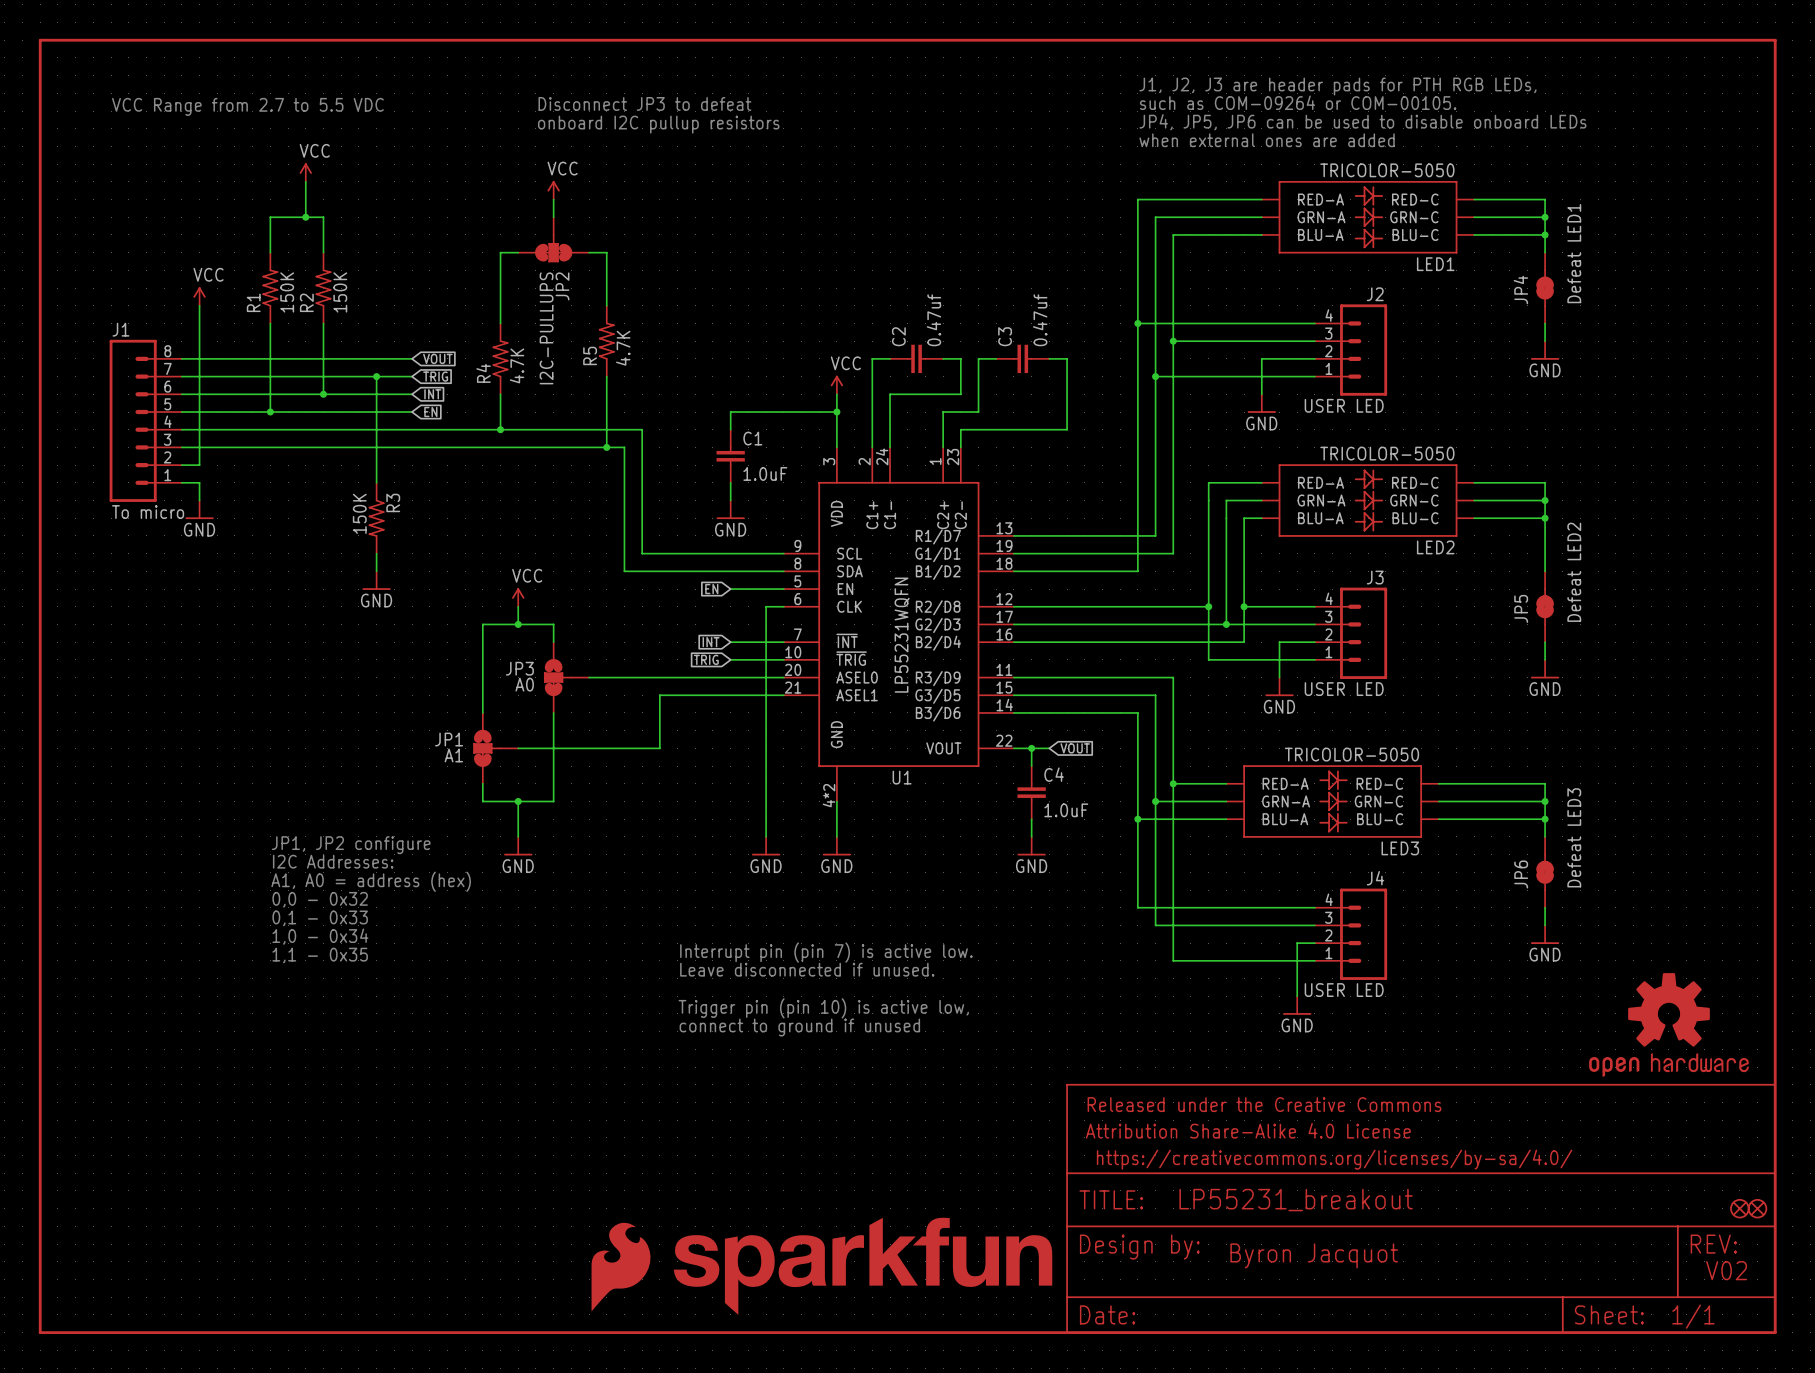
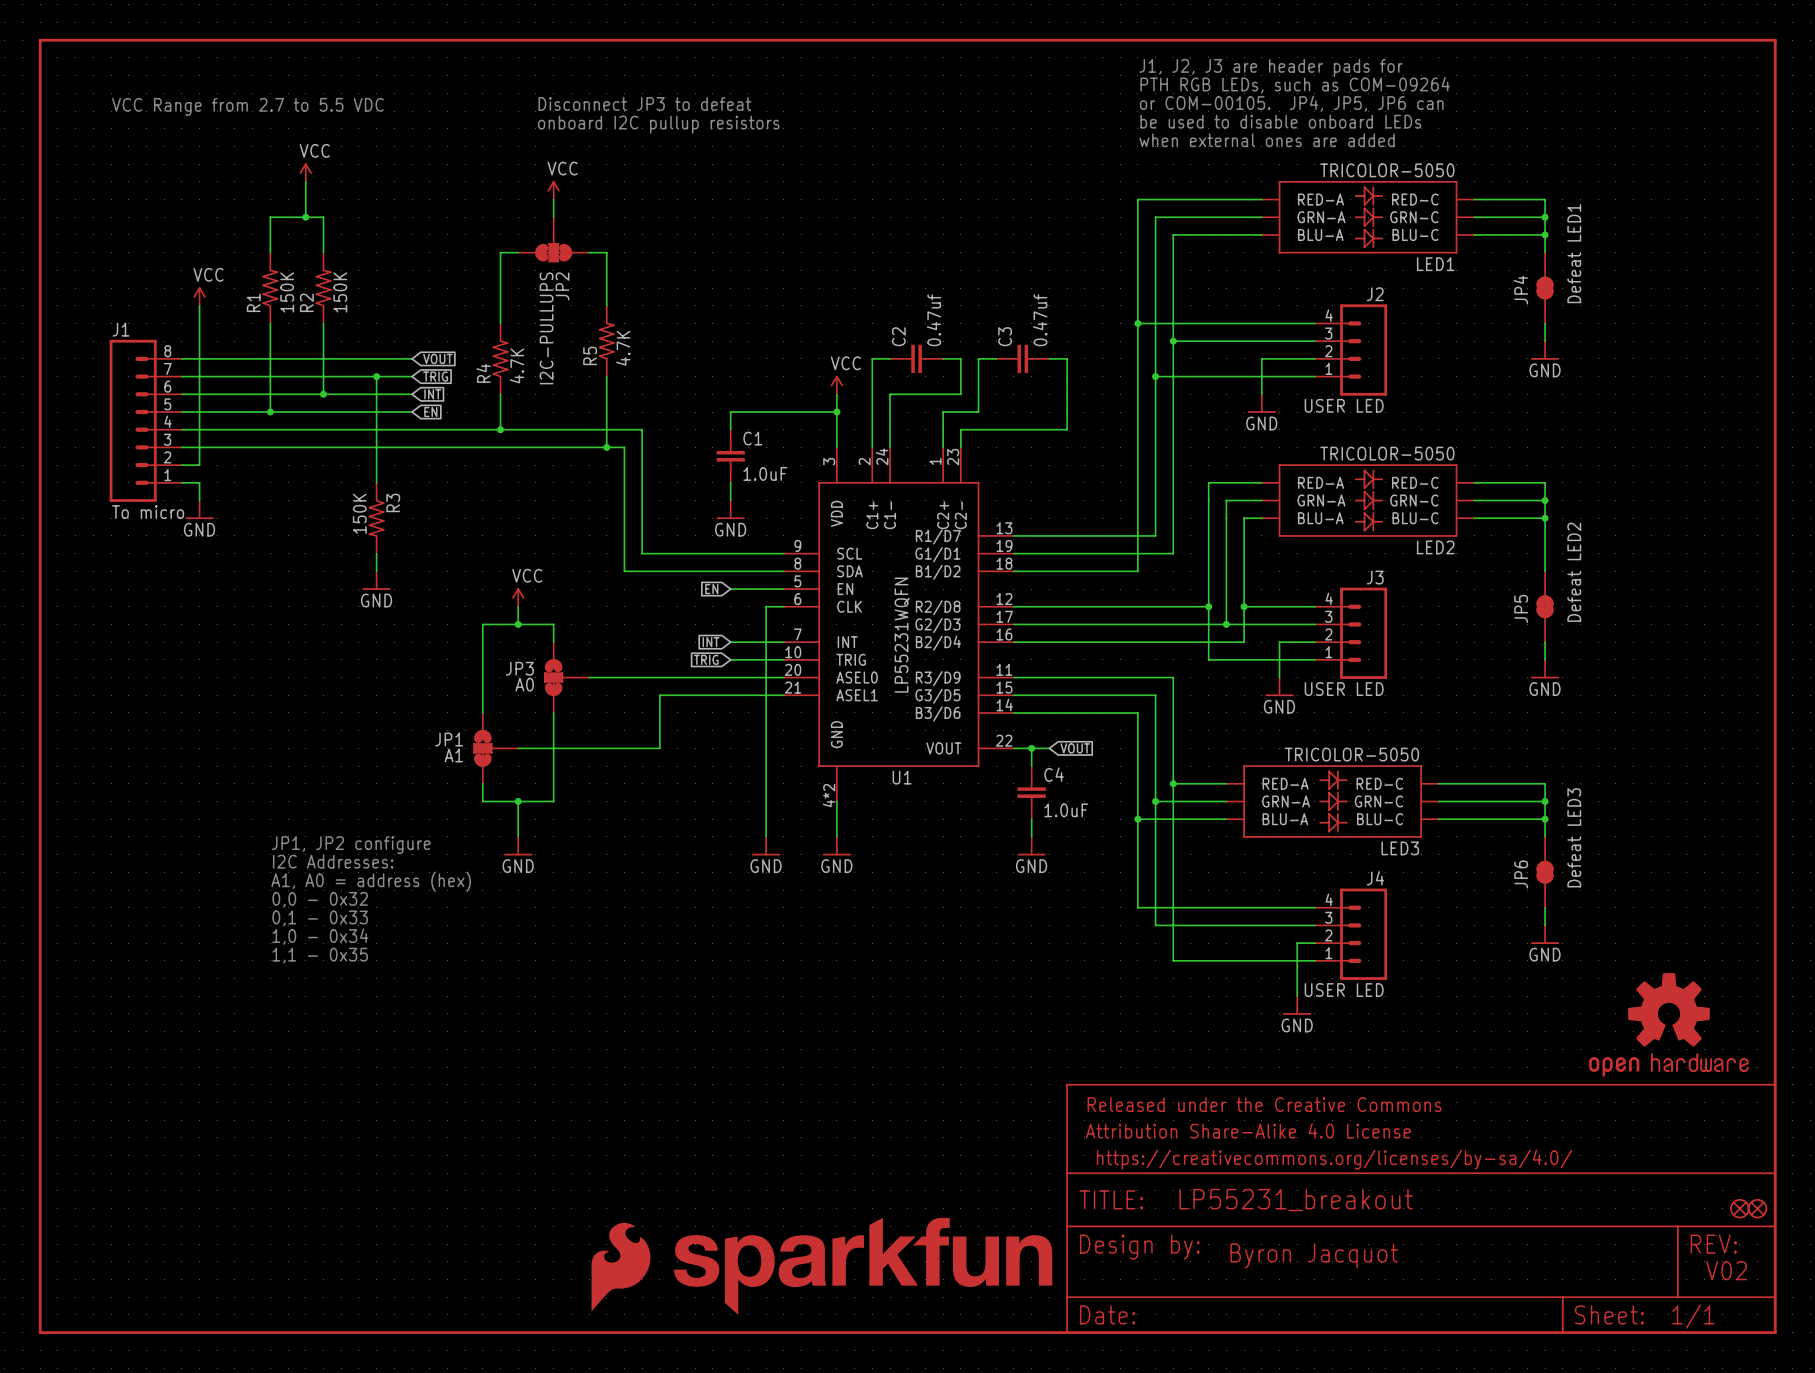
text: none -> J1, J2, J3 are header pads for (1271, 67)
text: J1, J2, J3 are header pads for PTH RGB LEDs, (1337, 86) -> PTH RGB LEDs, such as COM-09264 (1295, 85)
text: such as COM-09264 or COM-00105. (1298, 102) -> or COM-00105. JP4, JP5, JP6 can (1291, 103)
text: JP4, JP5, JP6 can be used to disable onboard LEDs (1362, 122) -> be used to disable onboard LEDs (1280, 121)
U1 pin name: ~{INT} (847, 640) -> INT (847, 642)
U1 pin name: ~{TRIG} (851, 658) -> TRIG (851, 659)
text: Interrupt pin (pin 7) is active low. (826, 952) -> none
text: Leave disconnected if unused. (807, 969) -> none
text: Trigger pin (pin 10) is active low, (823, 1008) -> none
text: connect to ground if unused (799, 1027) -> none

